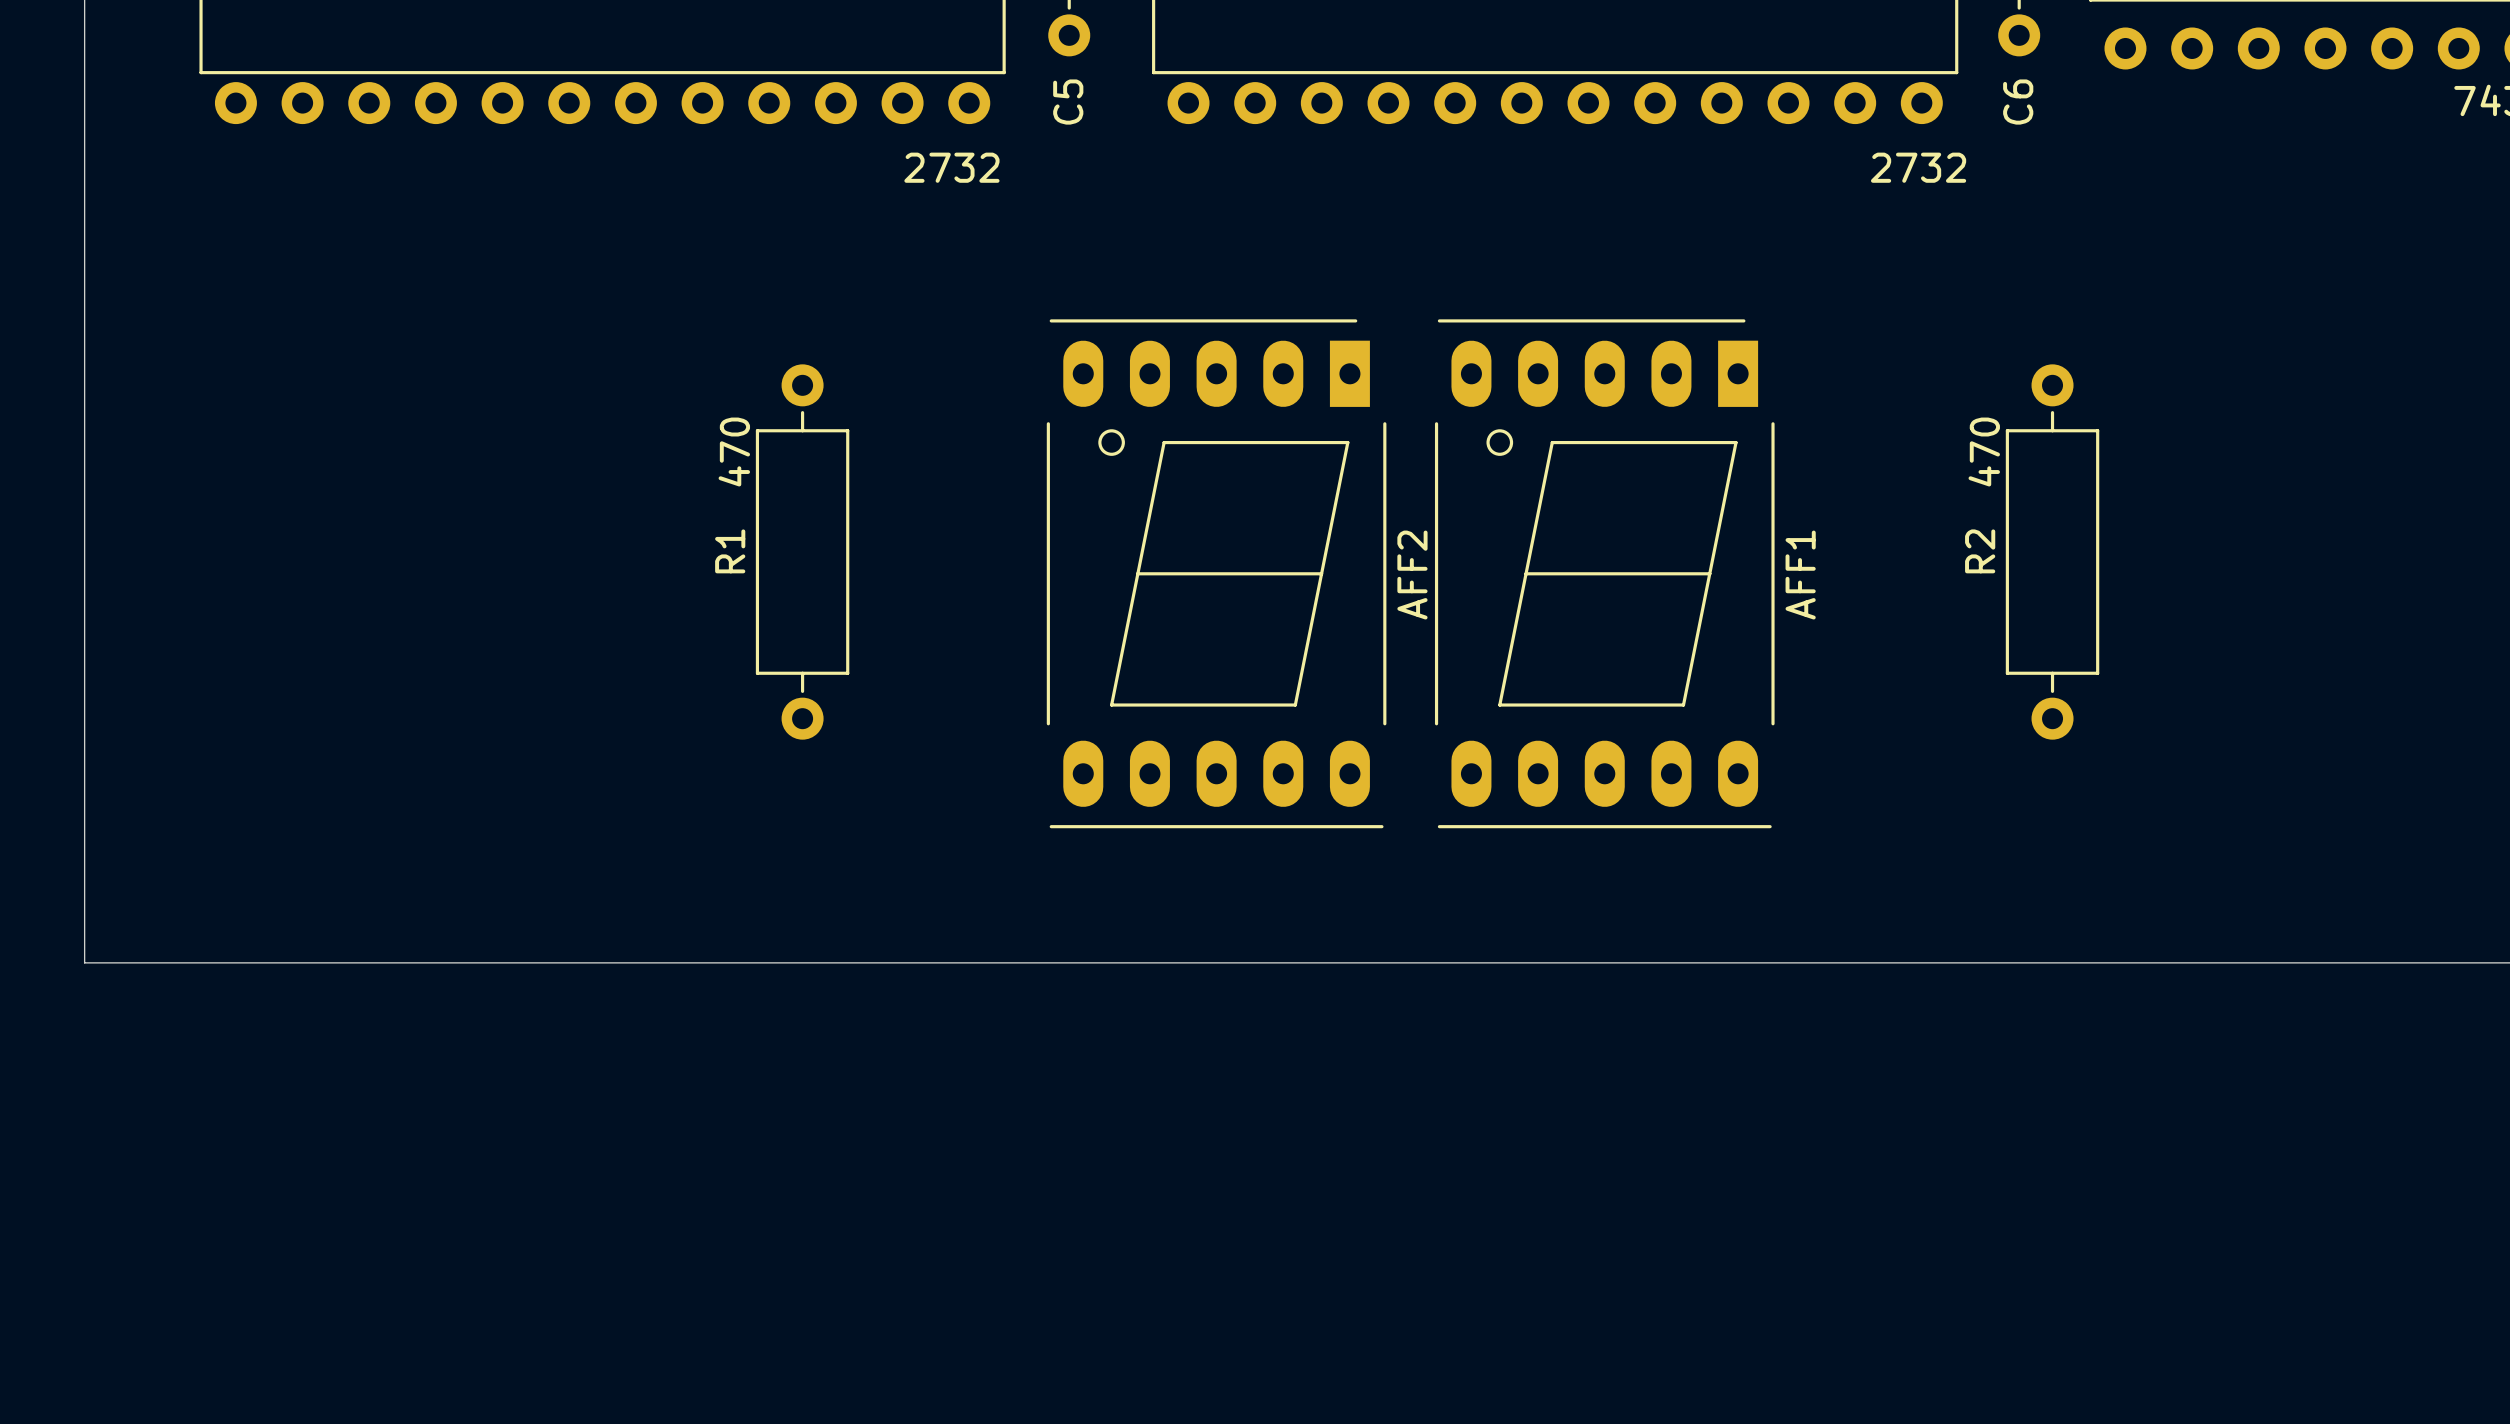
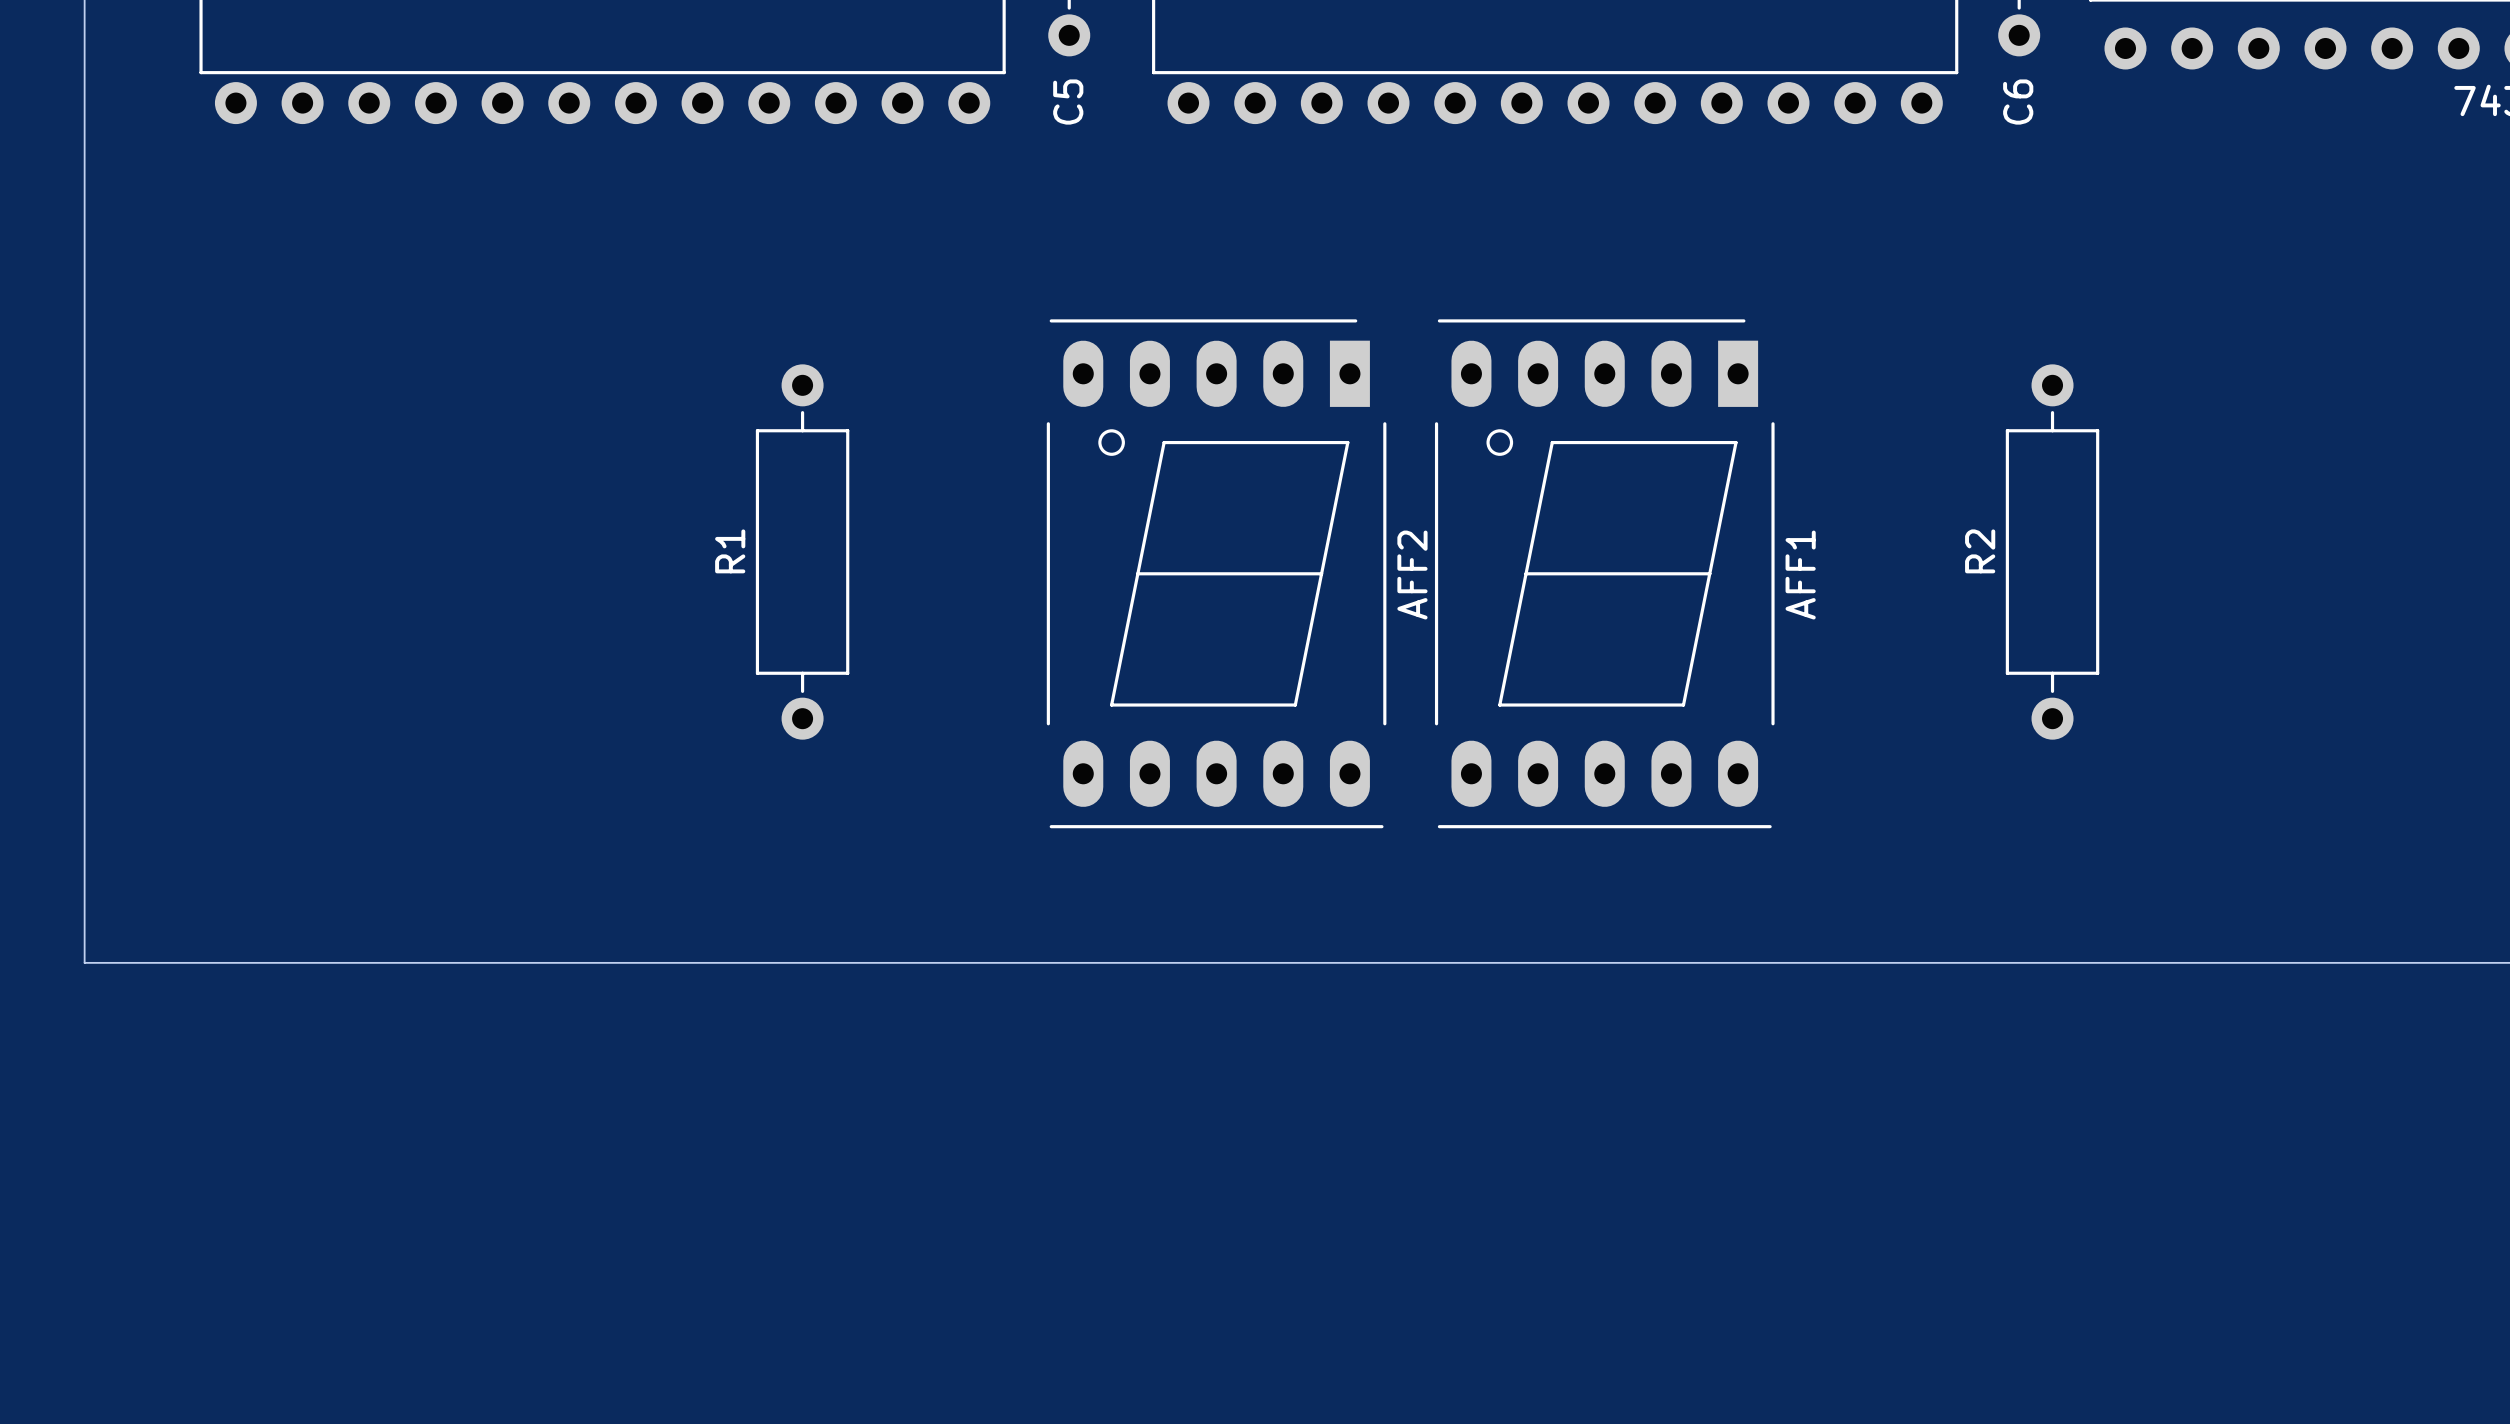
text: 2732 (951, 167) -> none
text: 2732 (1918, 167) -> none
text: 470 (734, 452) -> none
text: 470 (1984, 452) -> none

